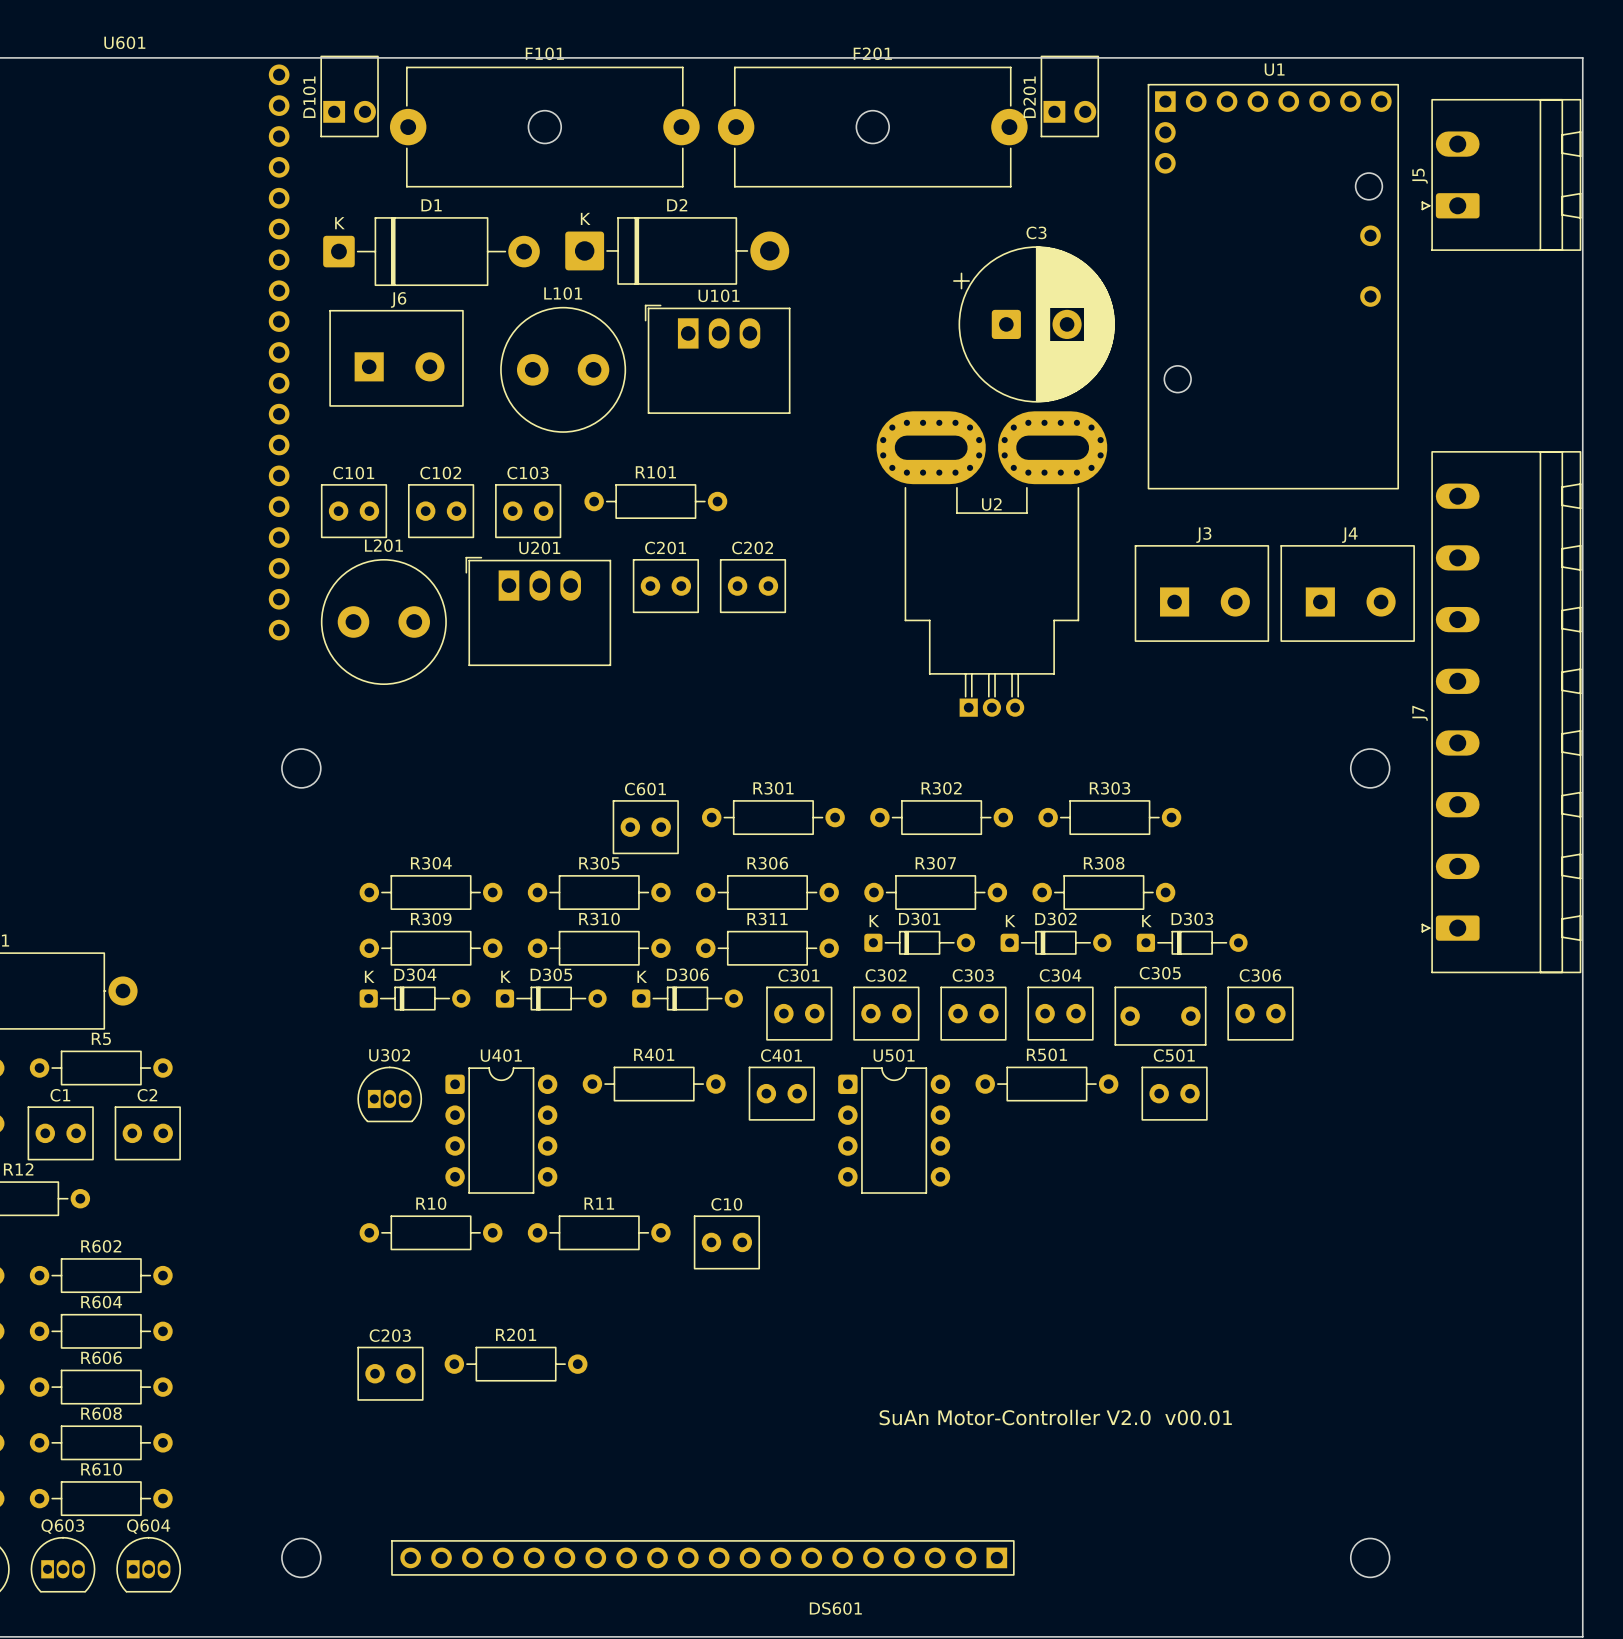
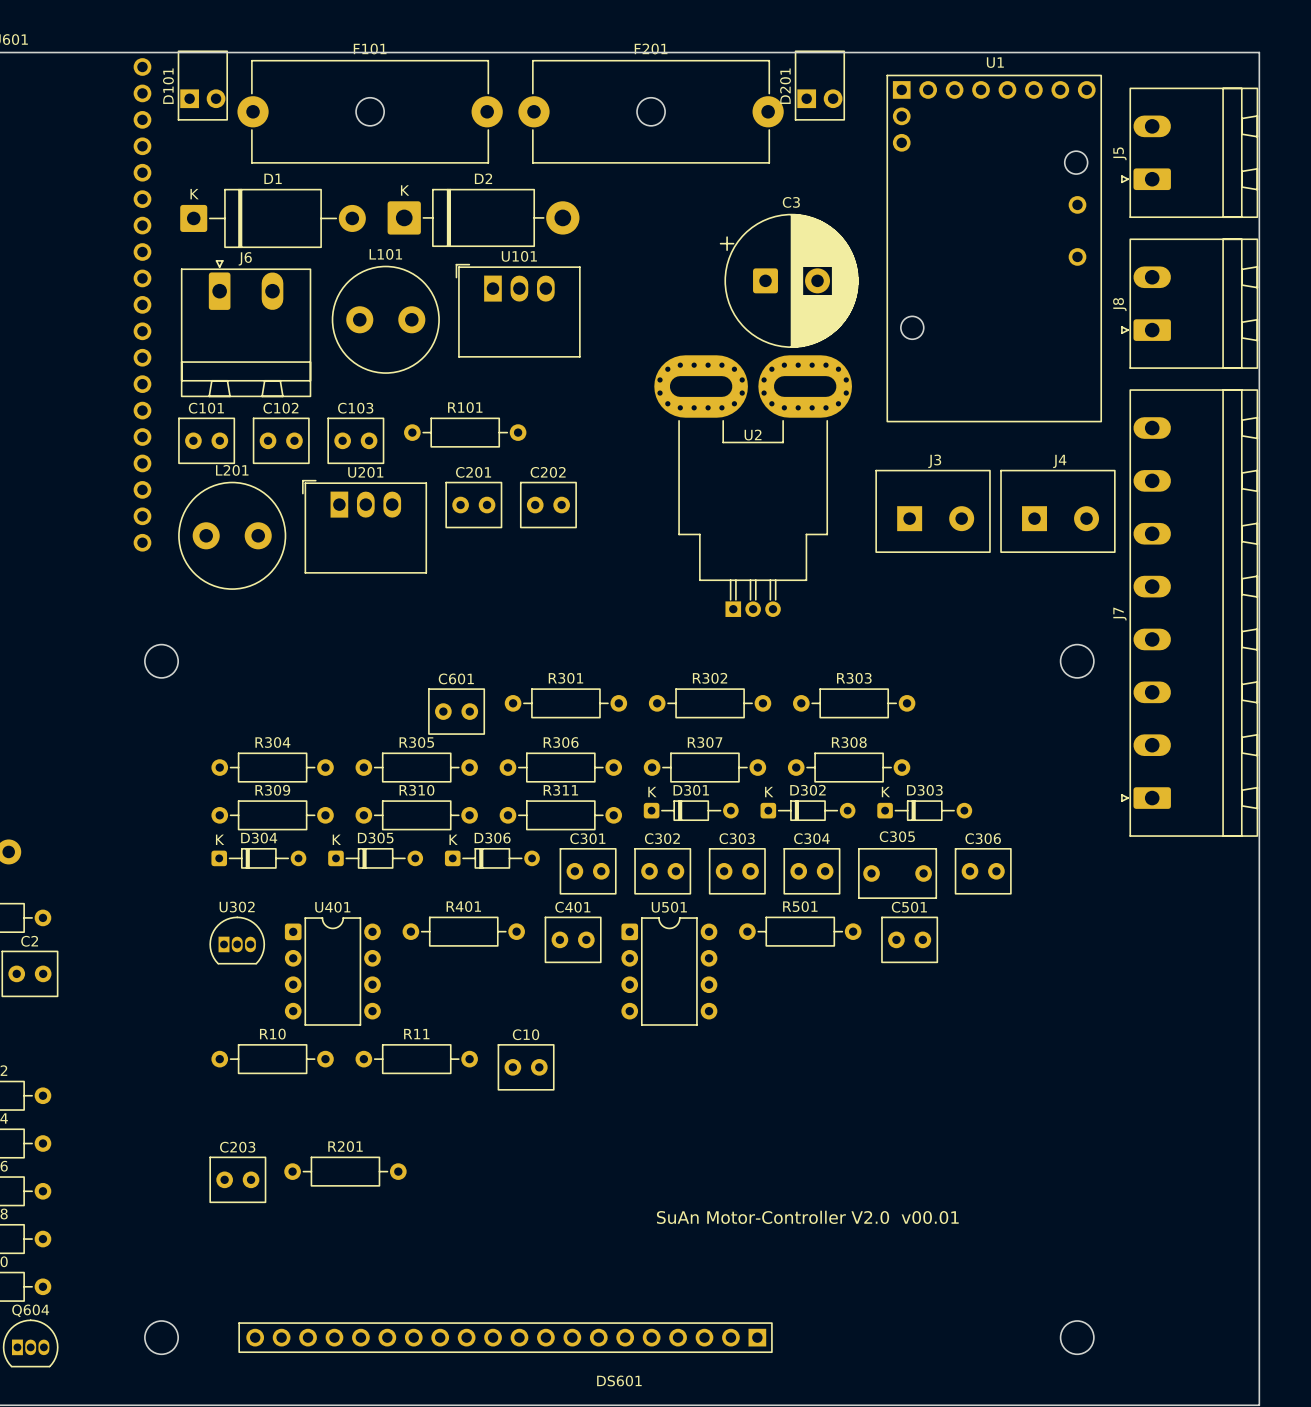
J6 footprint: [329, 310, 464, 407] -> [181, 260, 312, 398]
J8: none -> (1189, 303)

